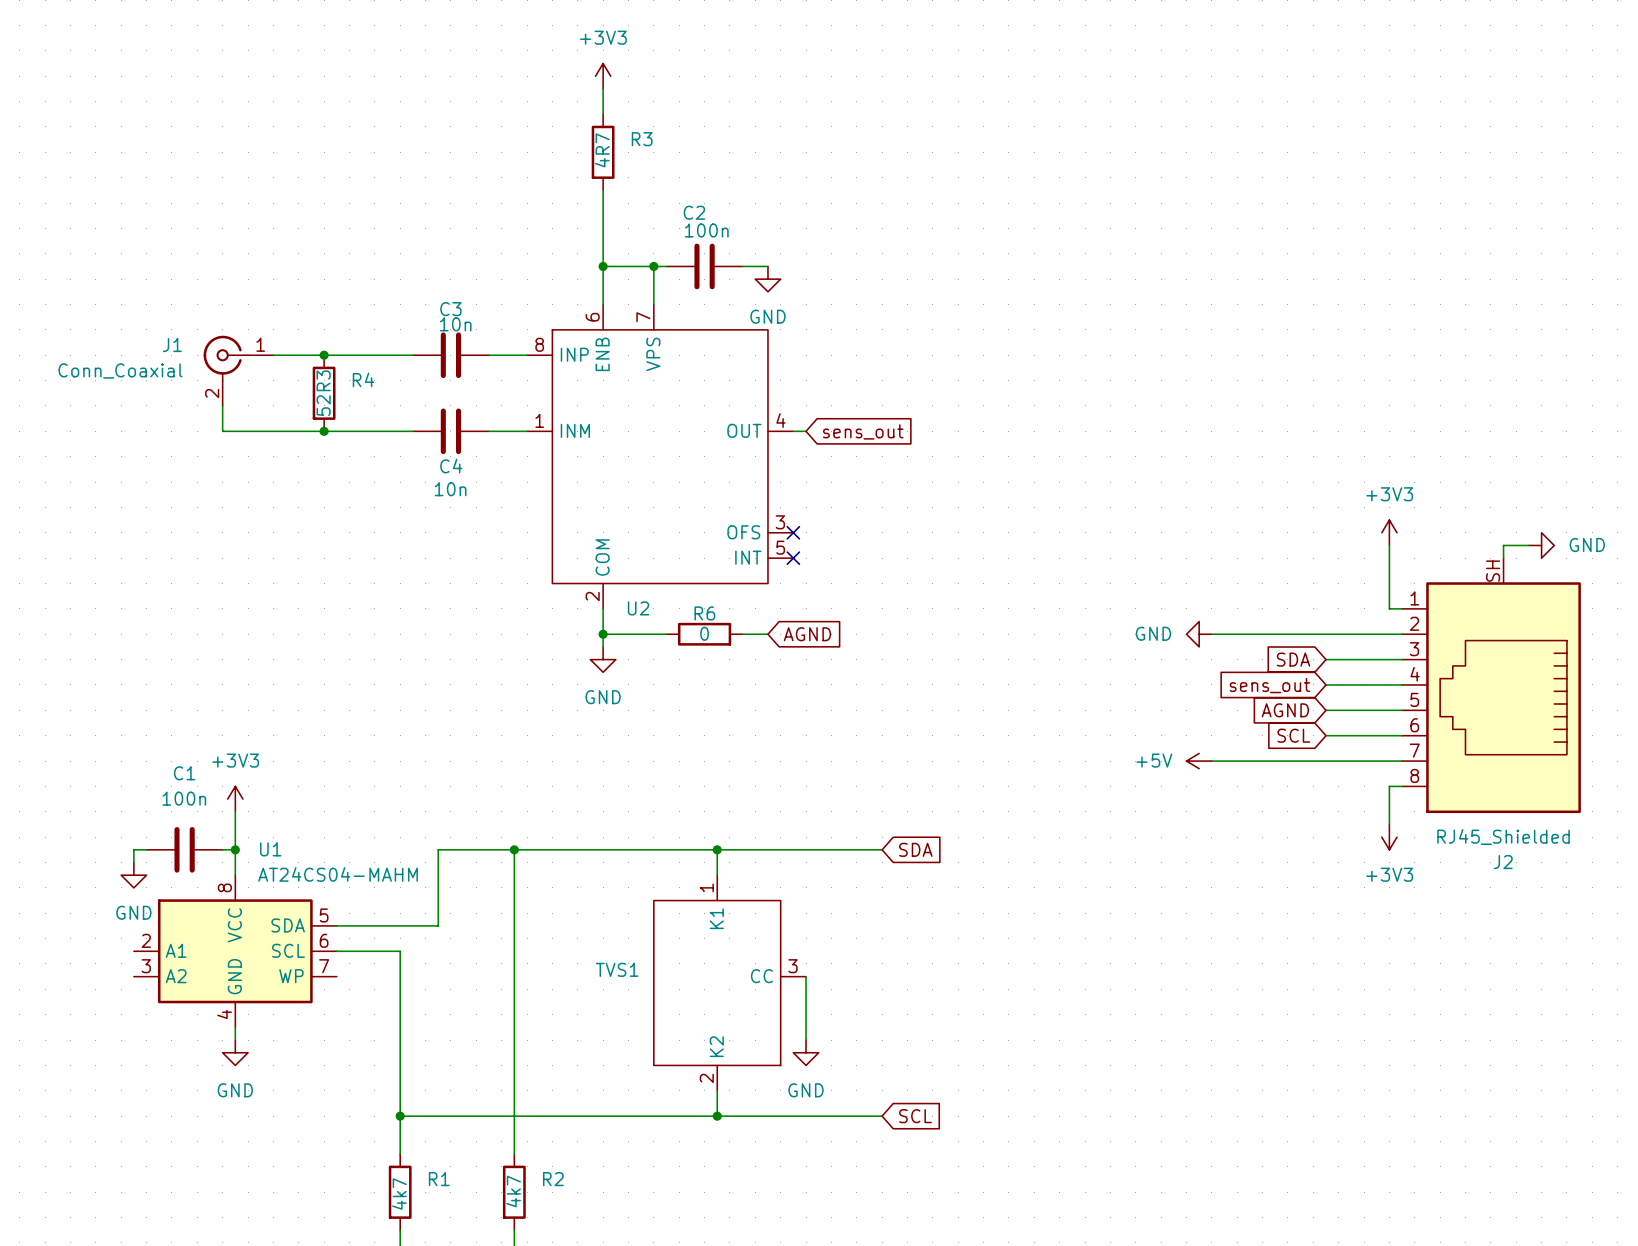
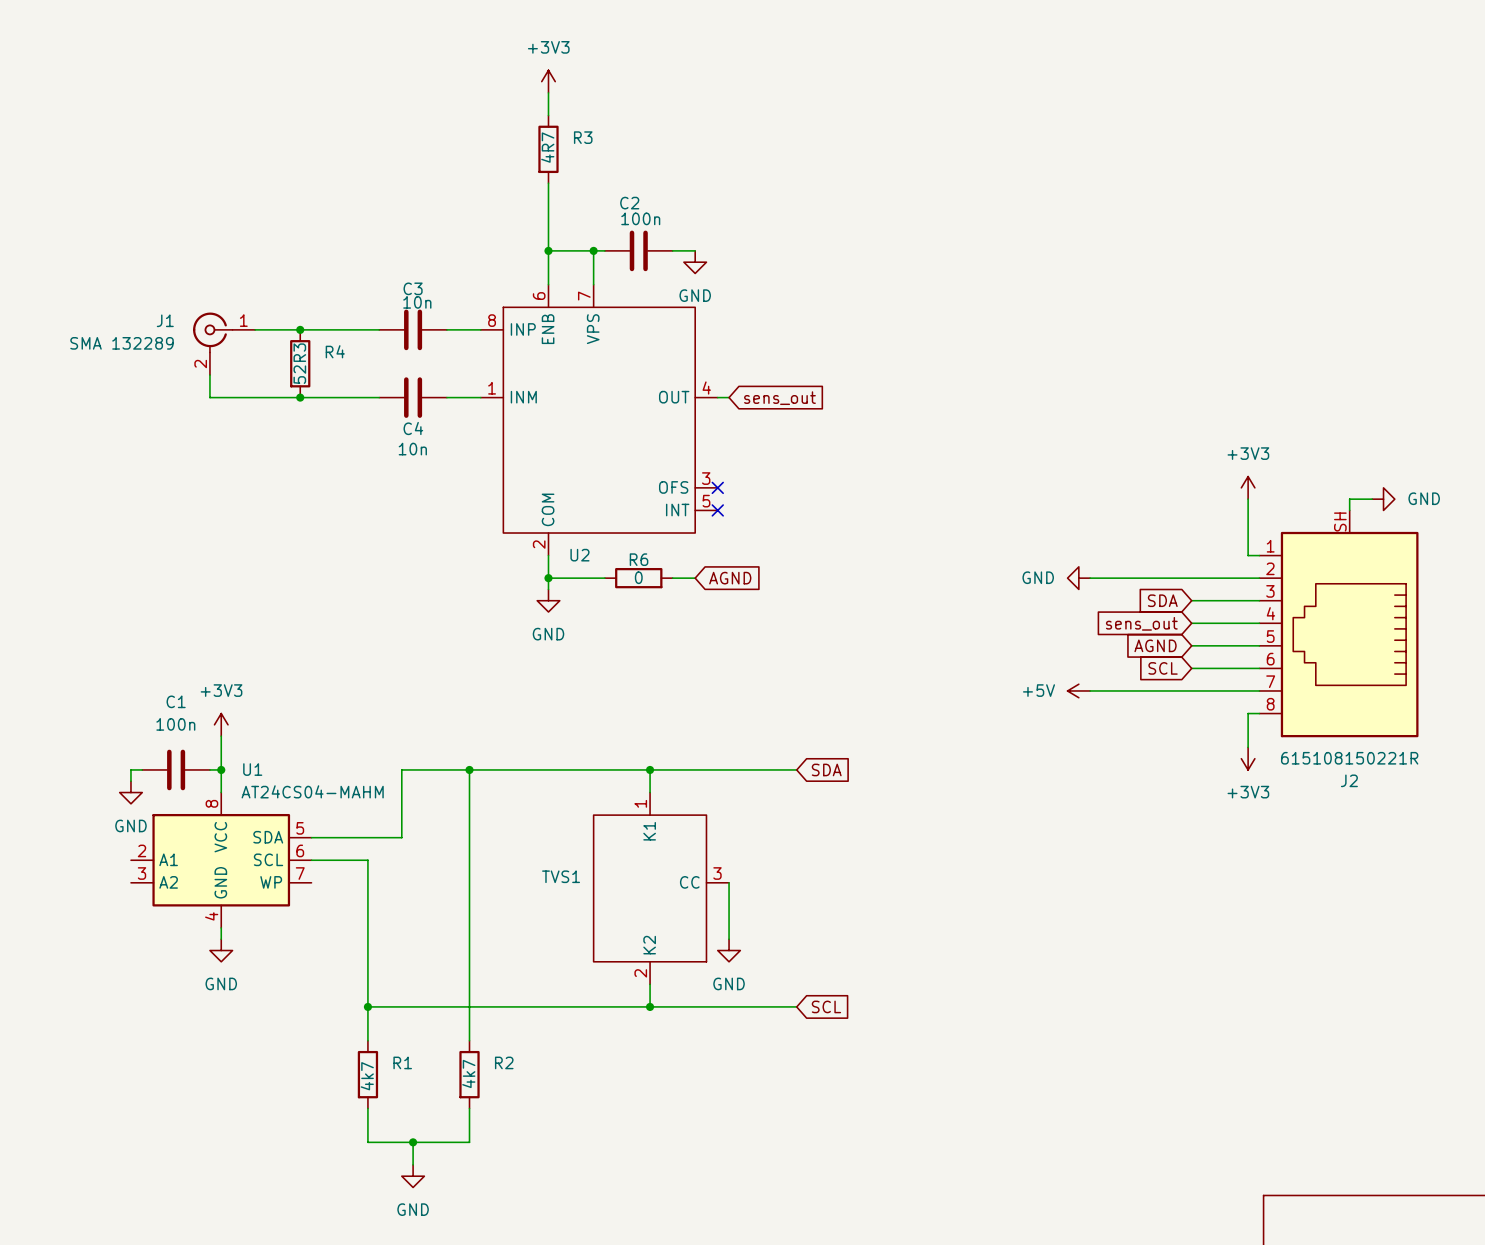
J1 value: Conn_Coaxial (120, 370) -> SMA 132289 (122, 343)
J2 value: RJ45_Shielded (1503, 836) -> 615108150221R (1349, 758)

